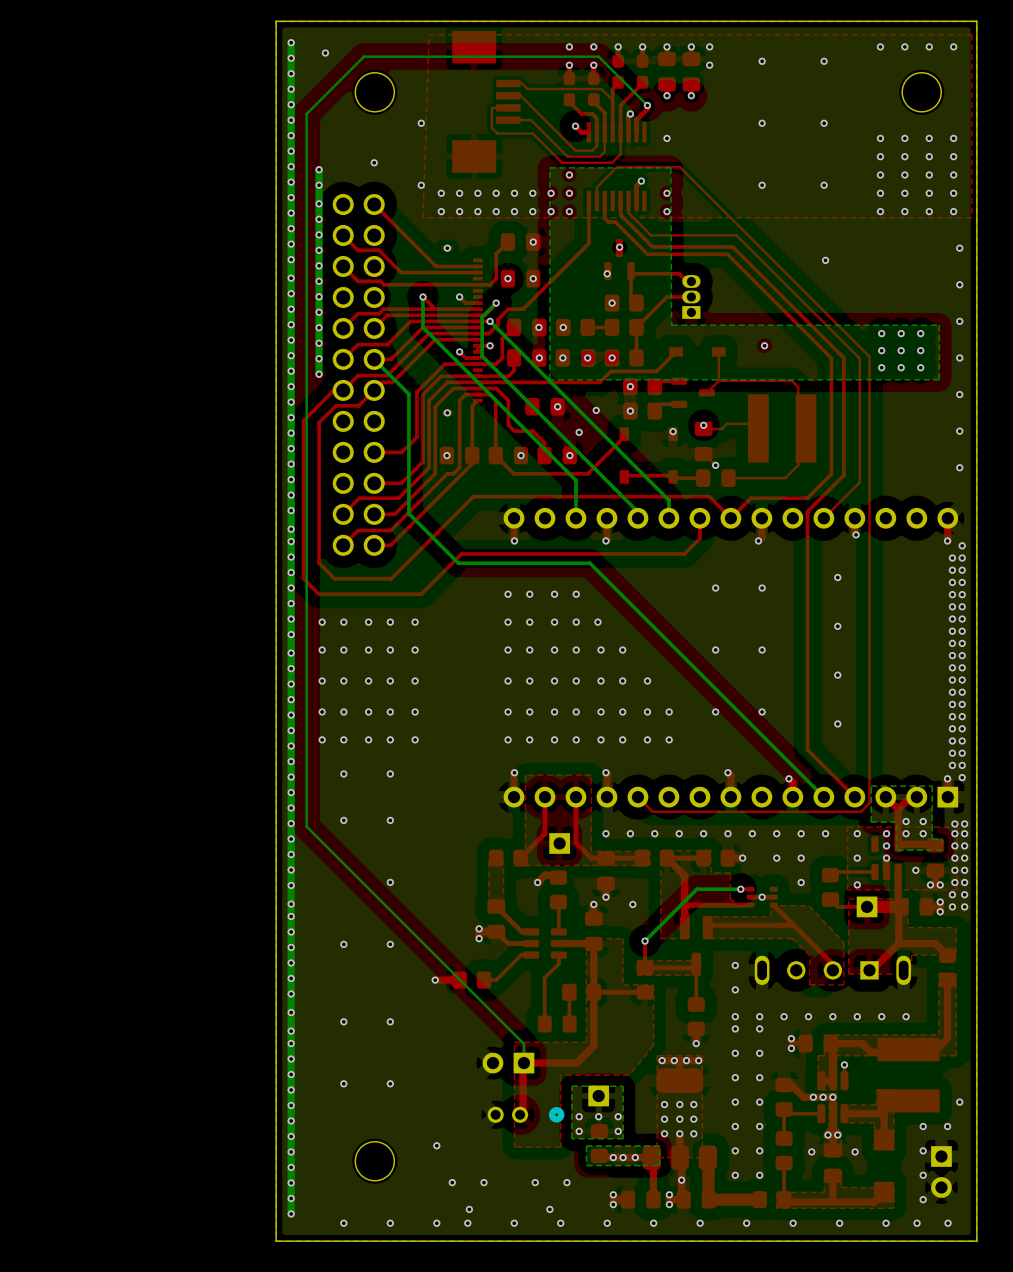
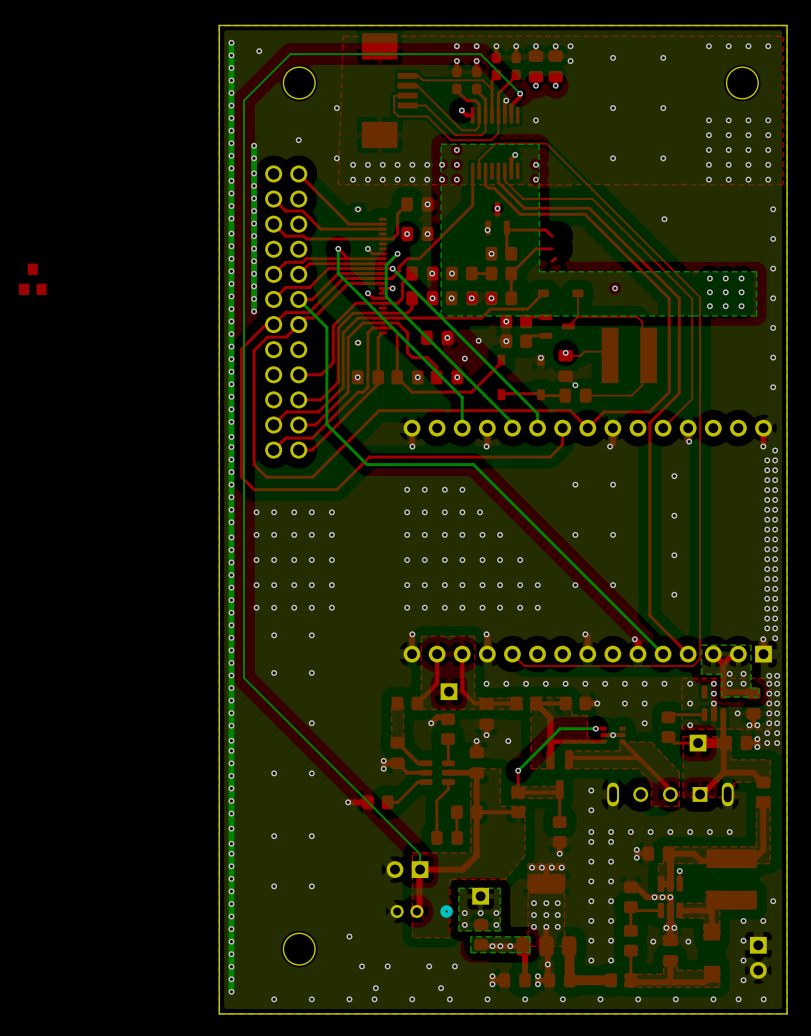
part: (691, 296) -> none
part: none -> (32, 279)

